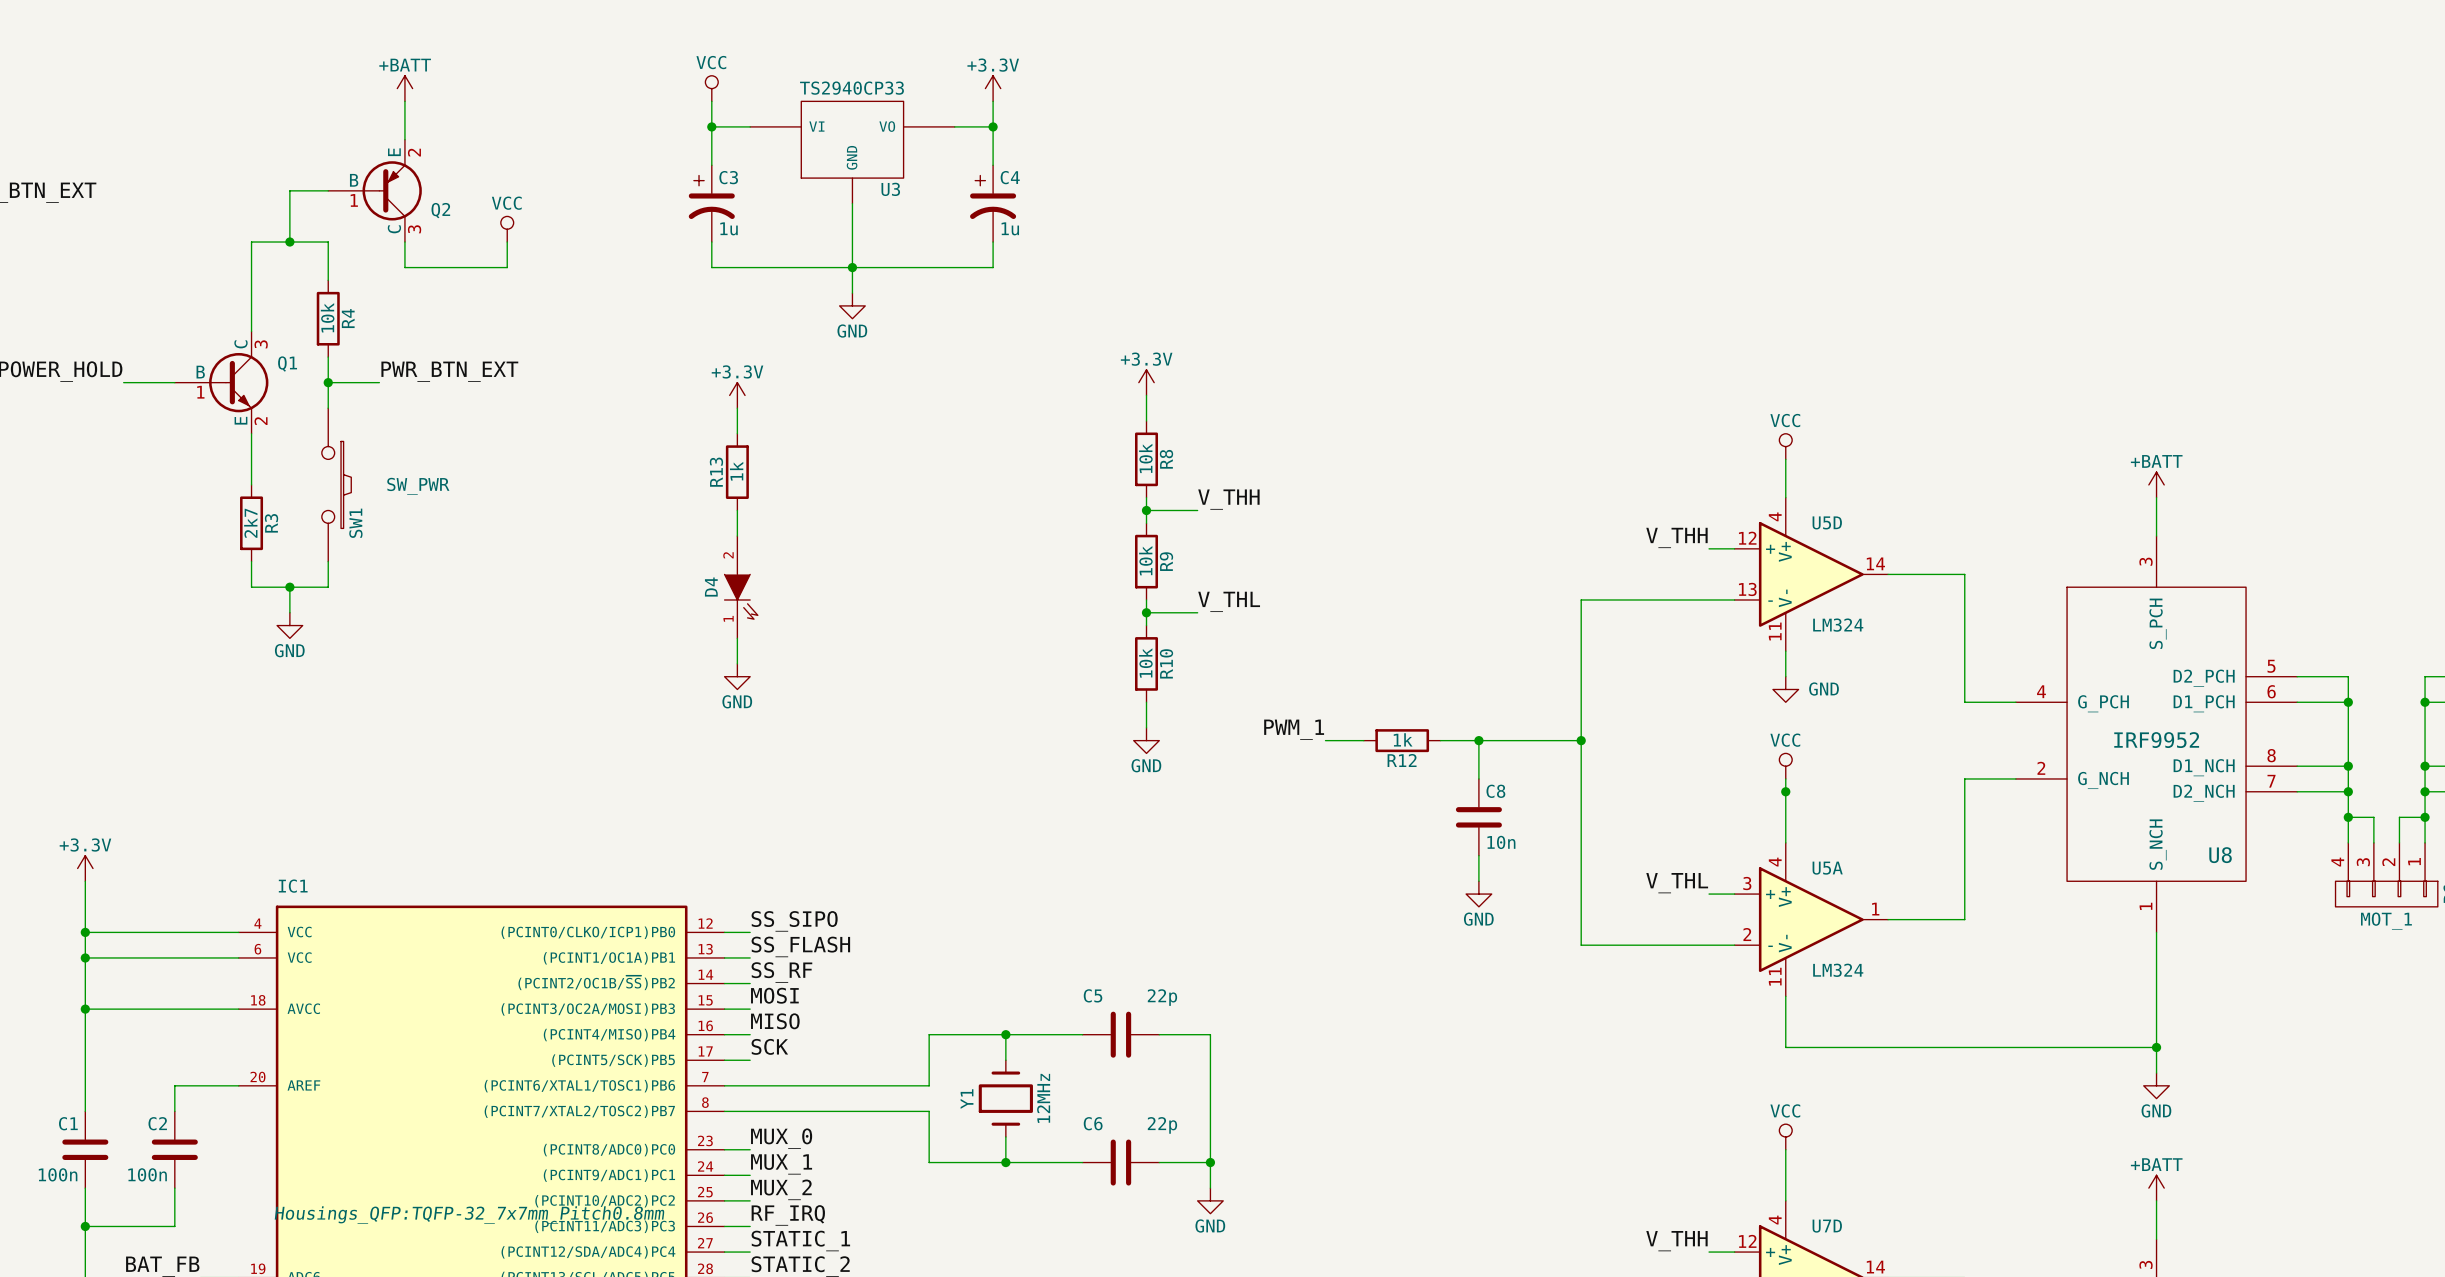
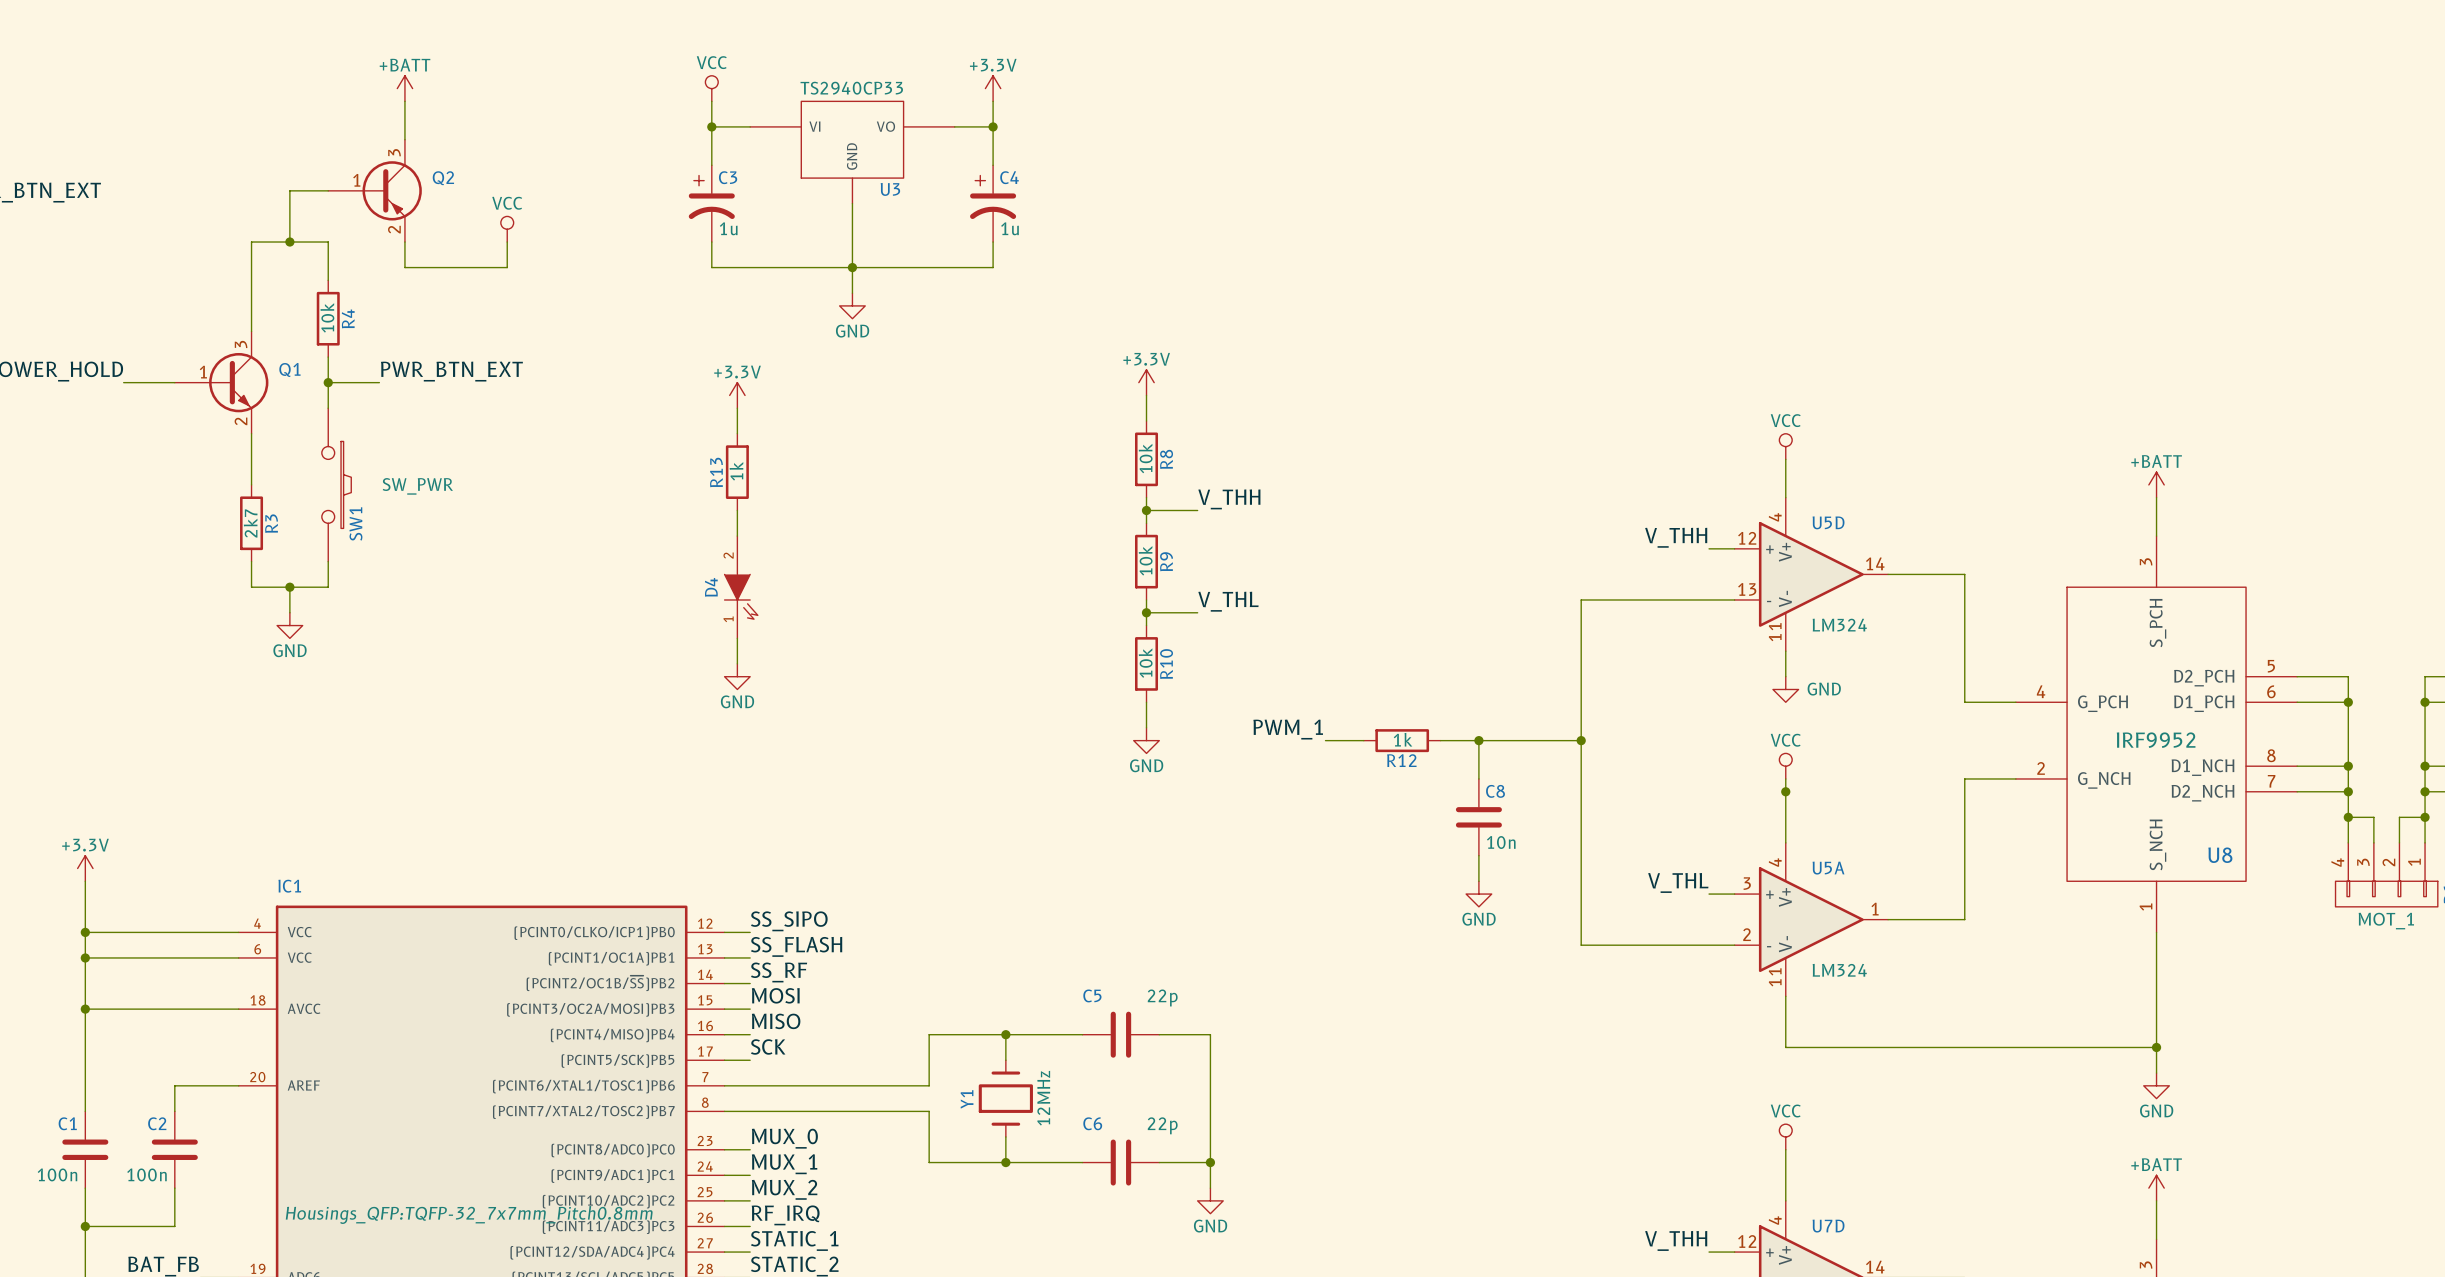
Q2 symbol: [328, 139, 422, 243] -> [328, 139, 422, 243]
Q2 name position: Q2 (440, 210) -> Q2 (443, 178)
Q1 symbol: [174, 331, 269, 434] -> [174, 331, 269, 434]

